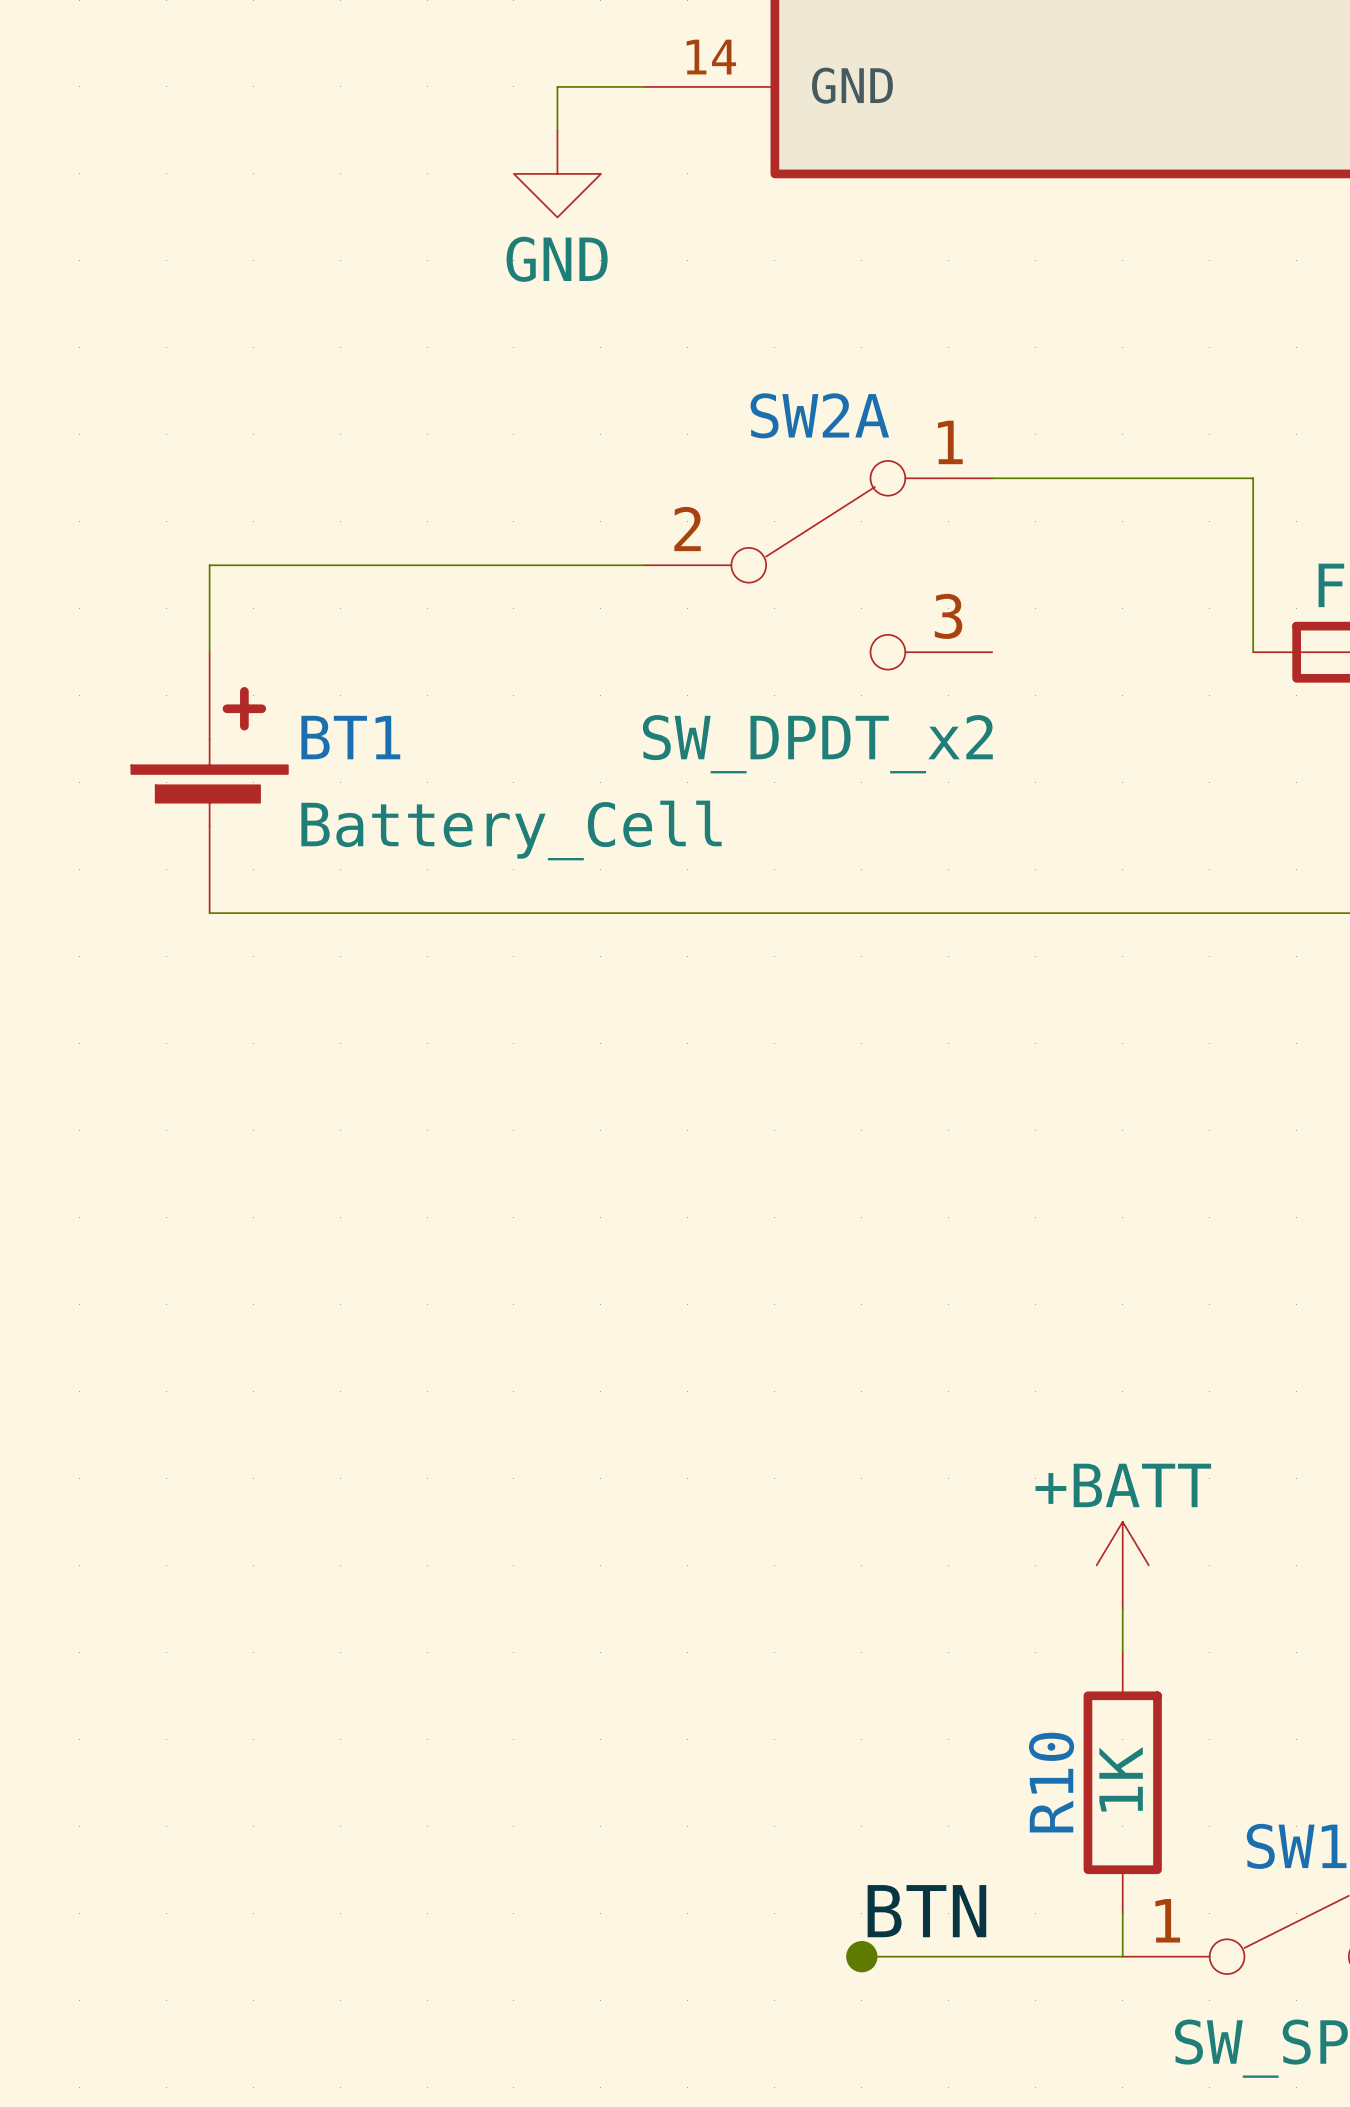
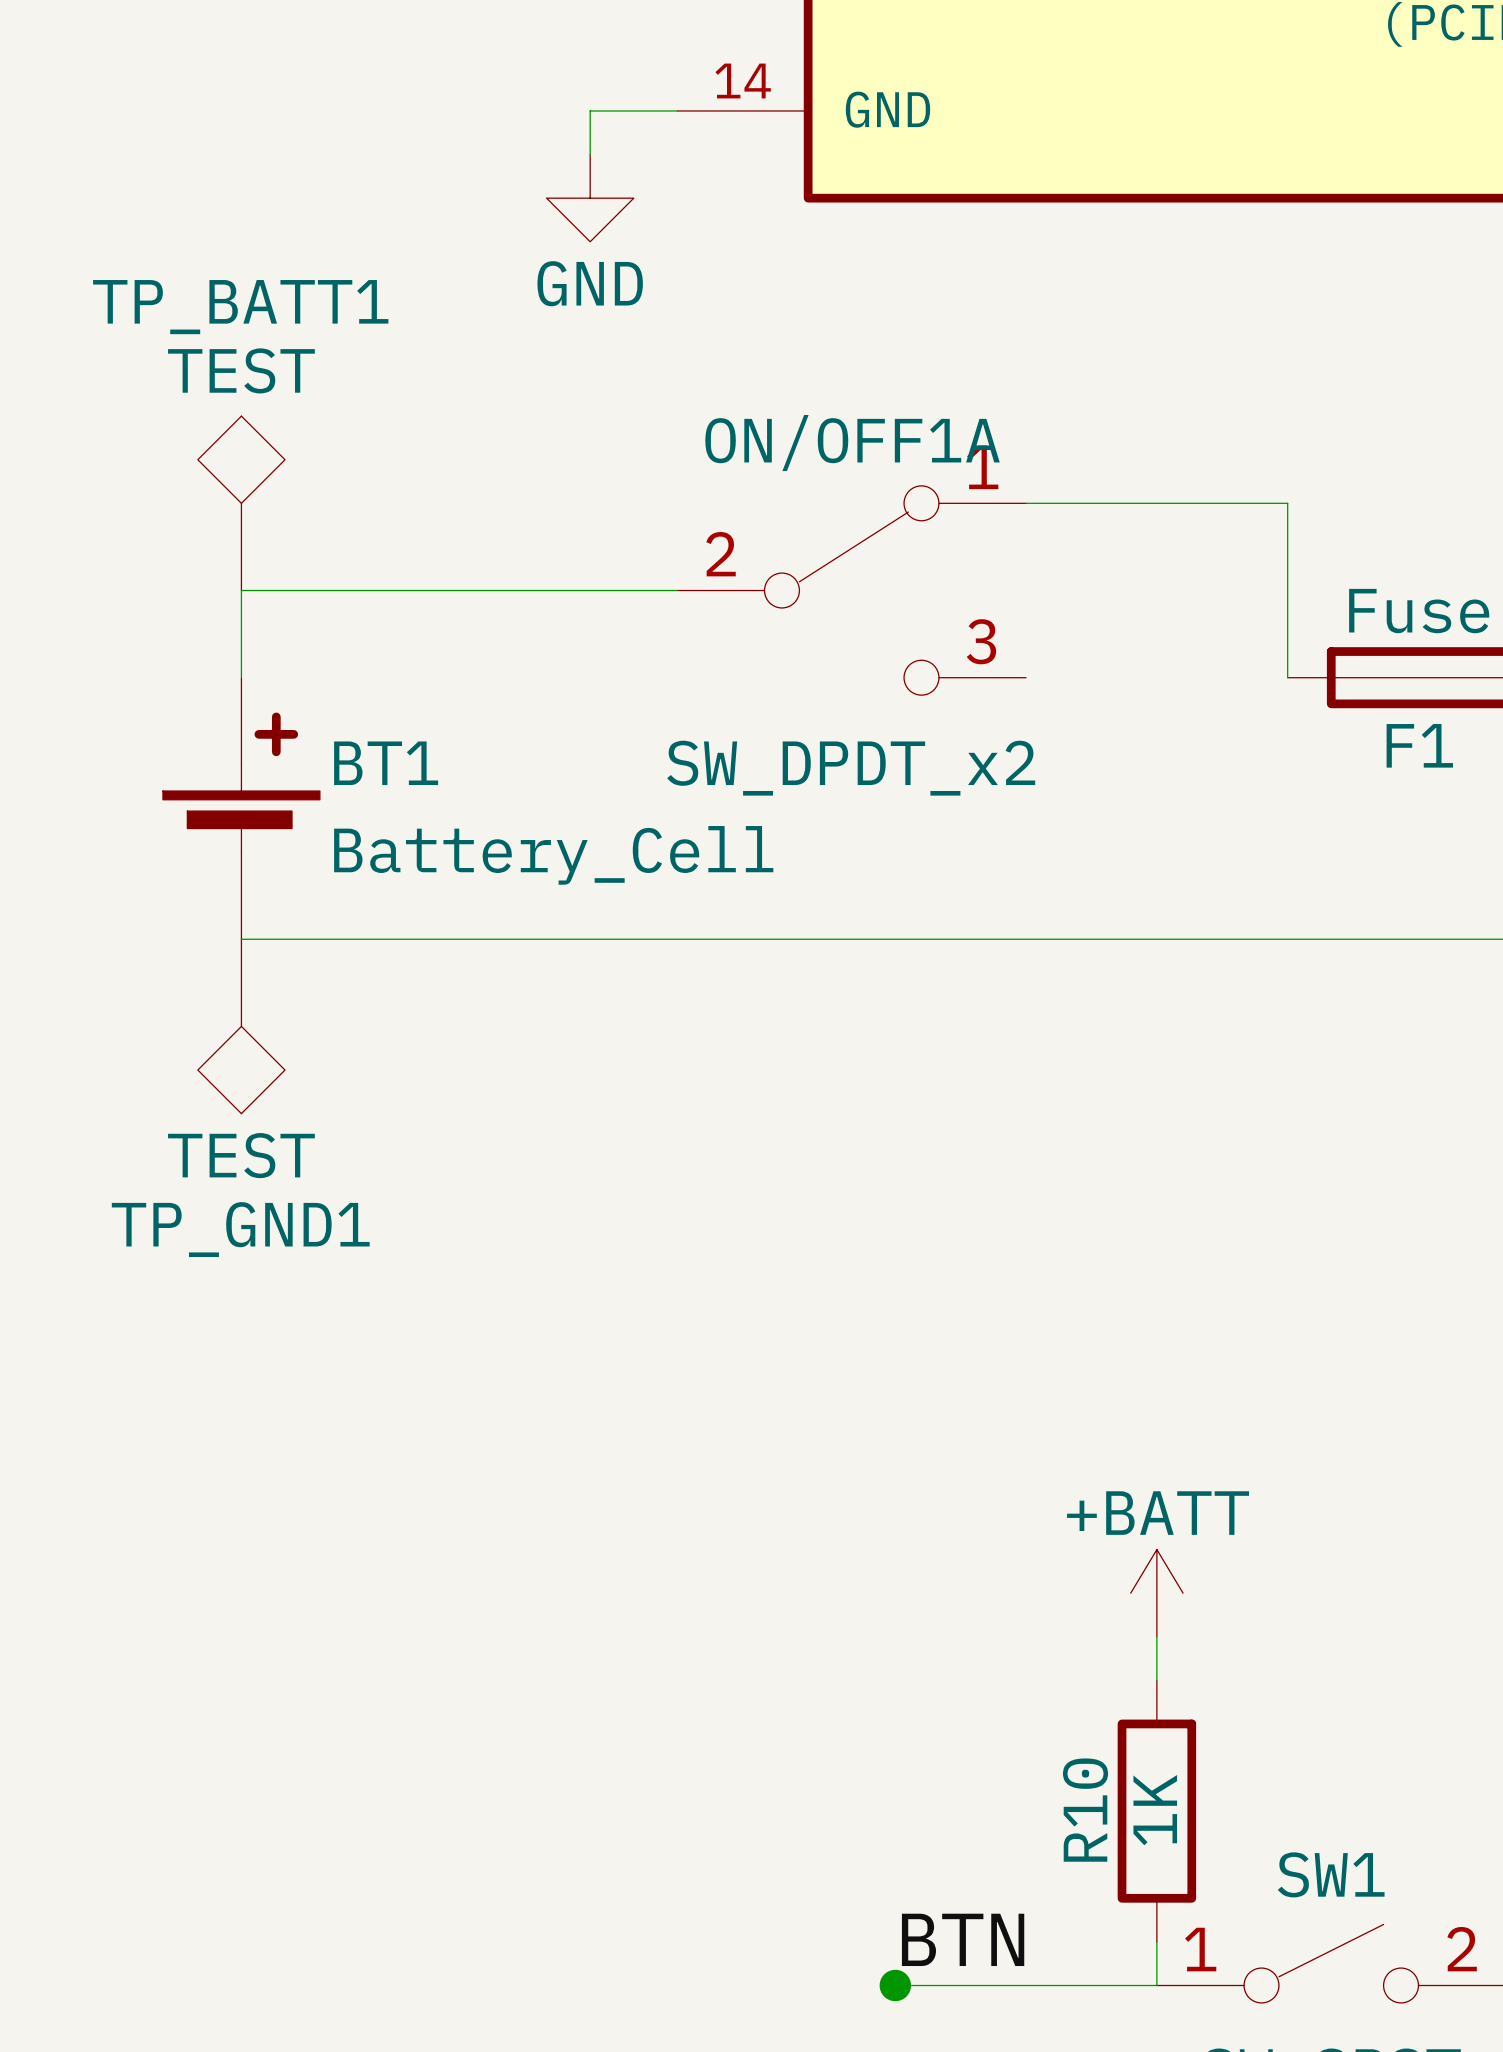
SW2A name: SW2A (819, 415) -> ON/OFF1A (852, 443)
TP_BATT1: none -> TEST (241, 503)
TP_GND1: none -> TEST (241, 1026)

